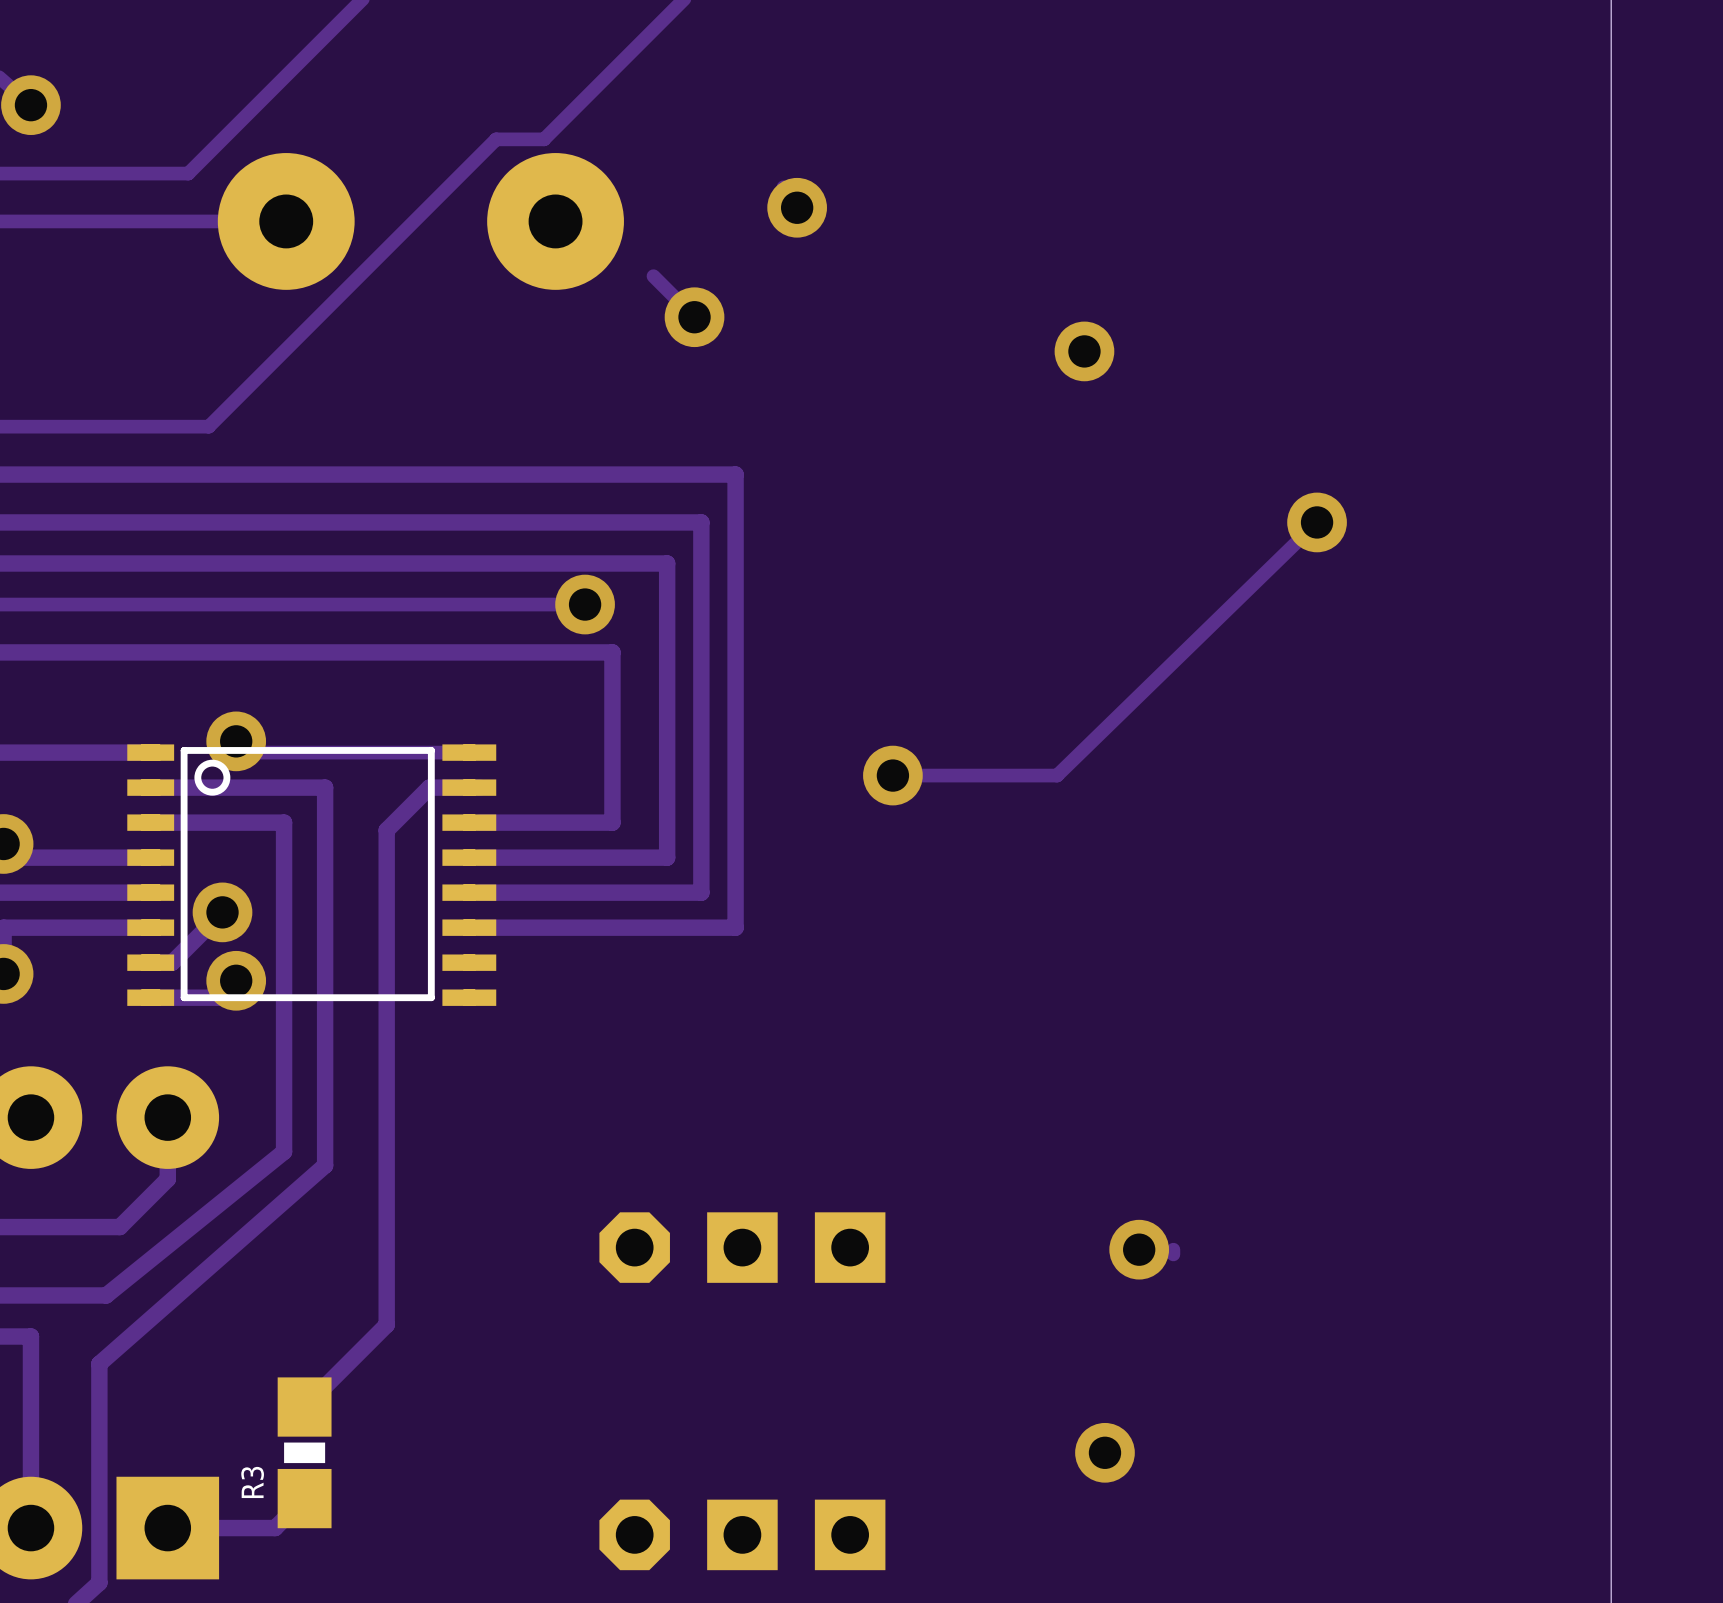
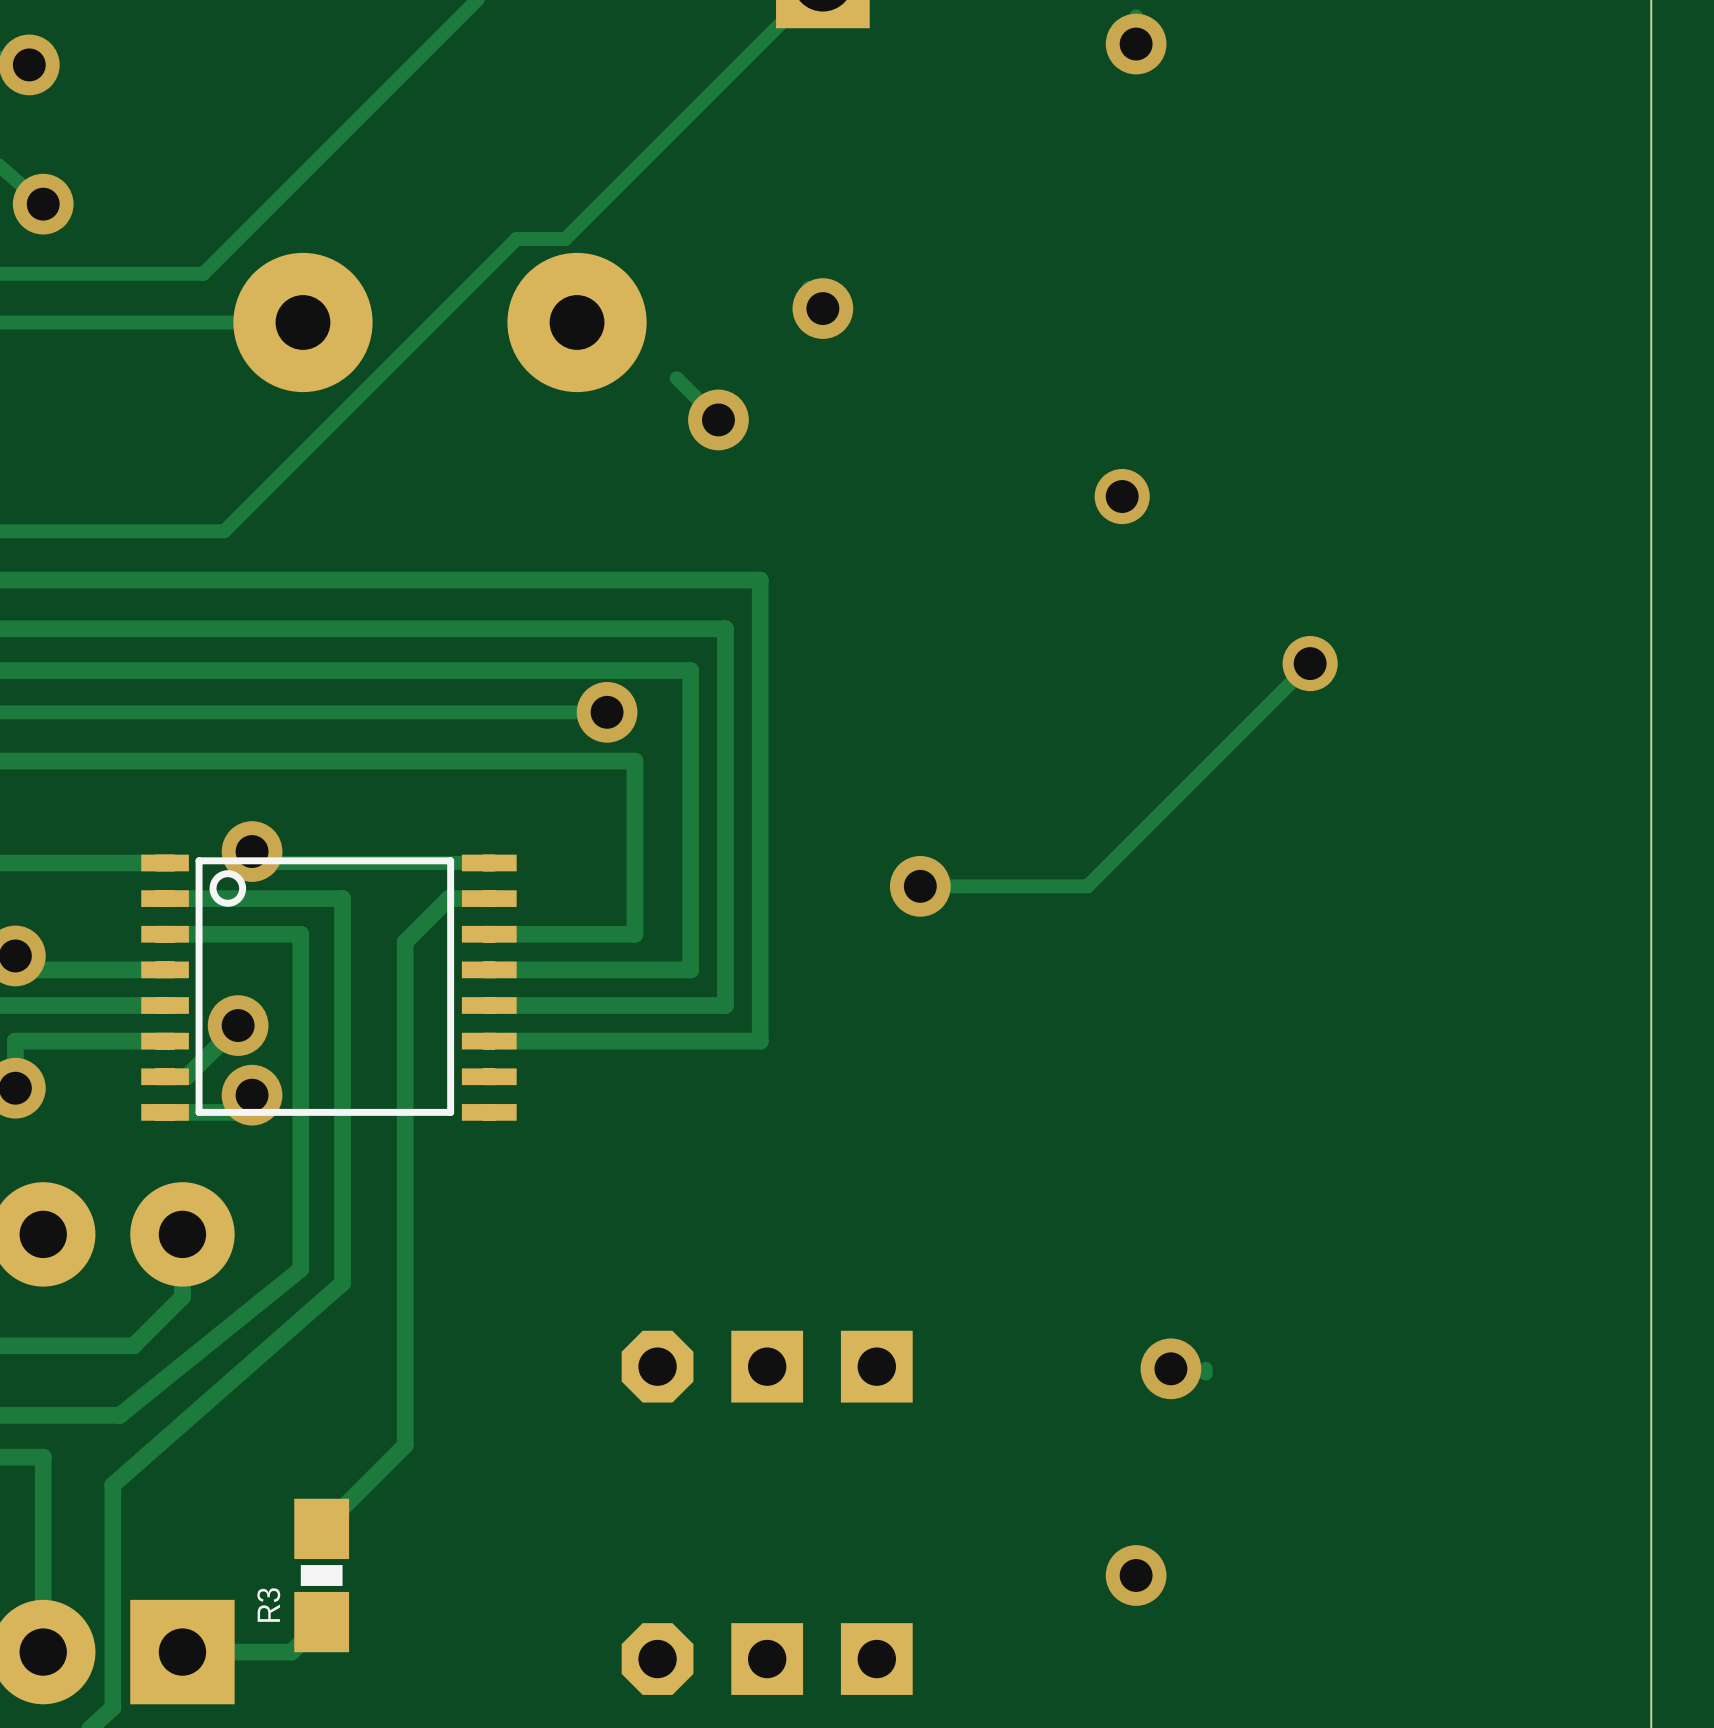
via position: (1084, 351) -> (1122, 496)
track: (1317, 522) (1057, 775) -> (1310, 663) (1087, 886)
via position: (1317, 522) -> (1310, 663)

